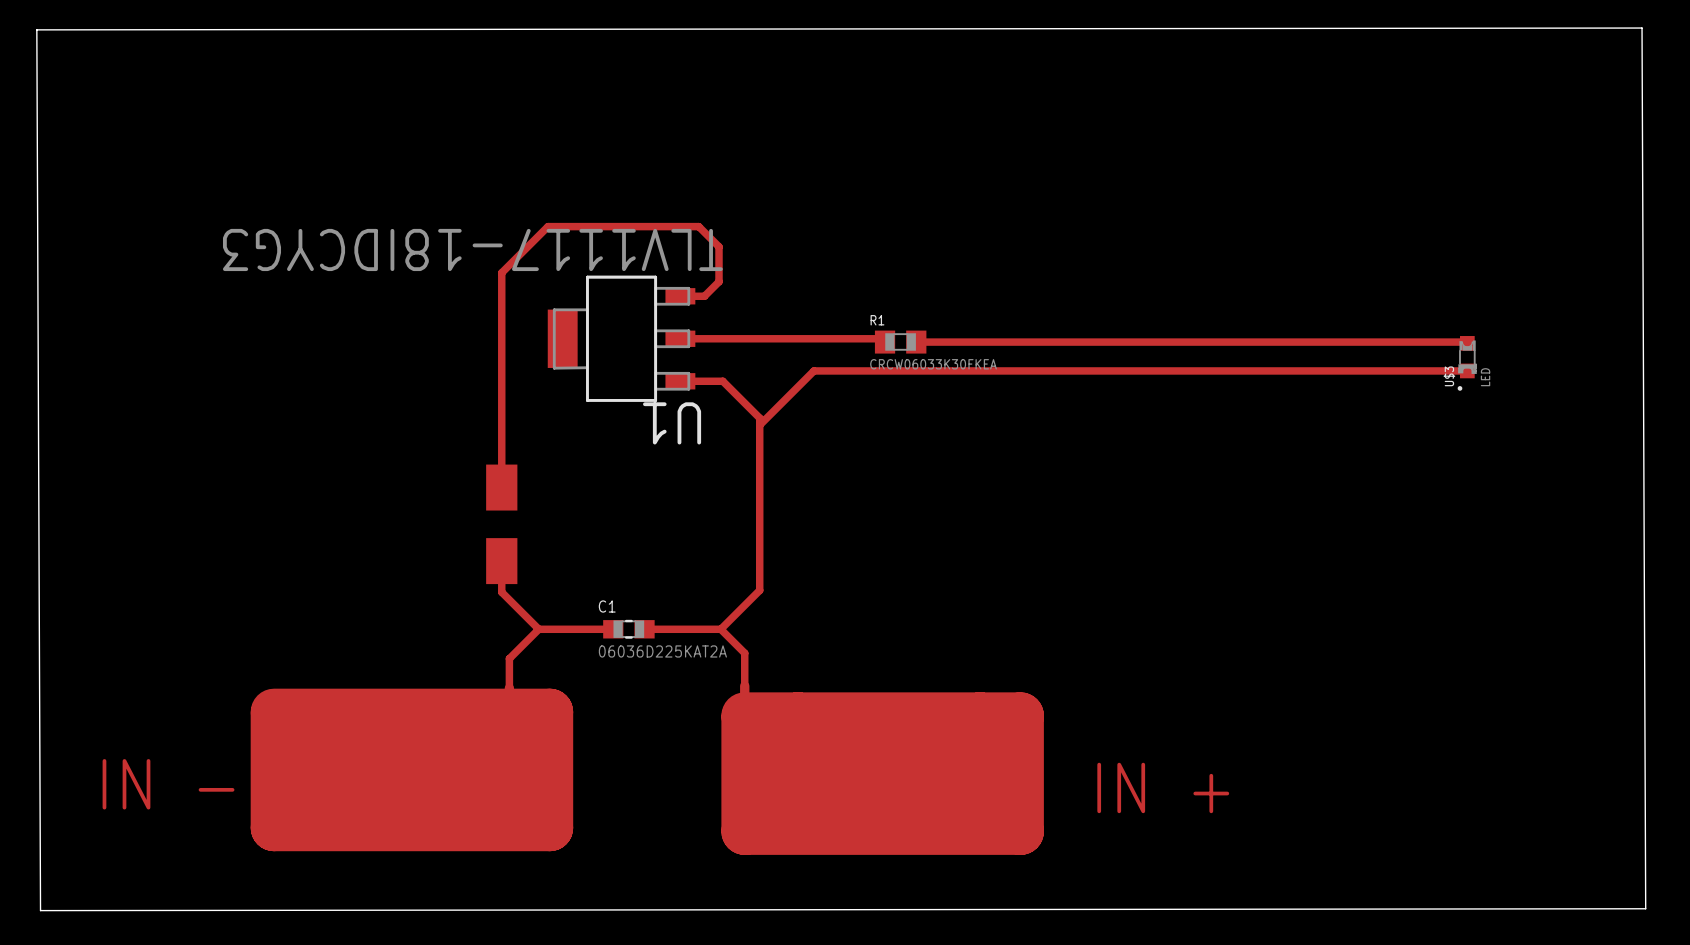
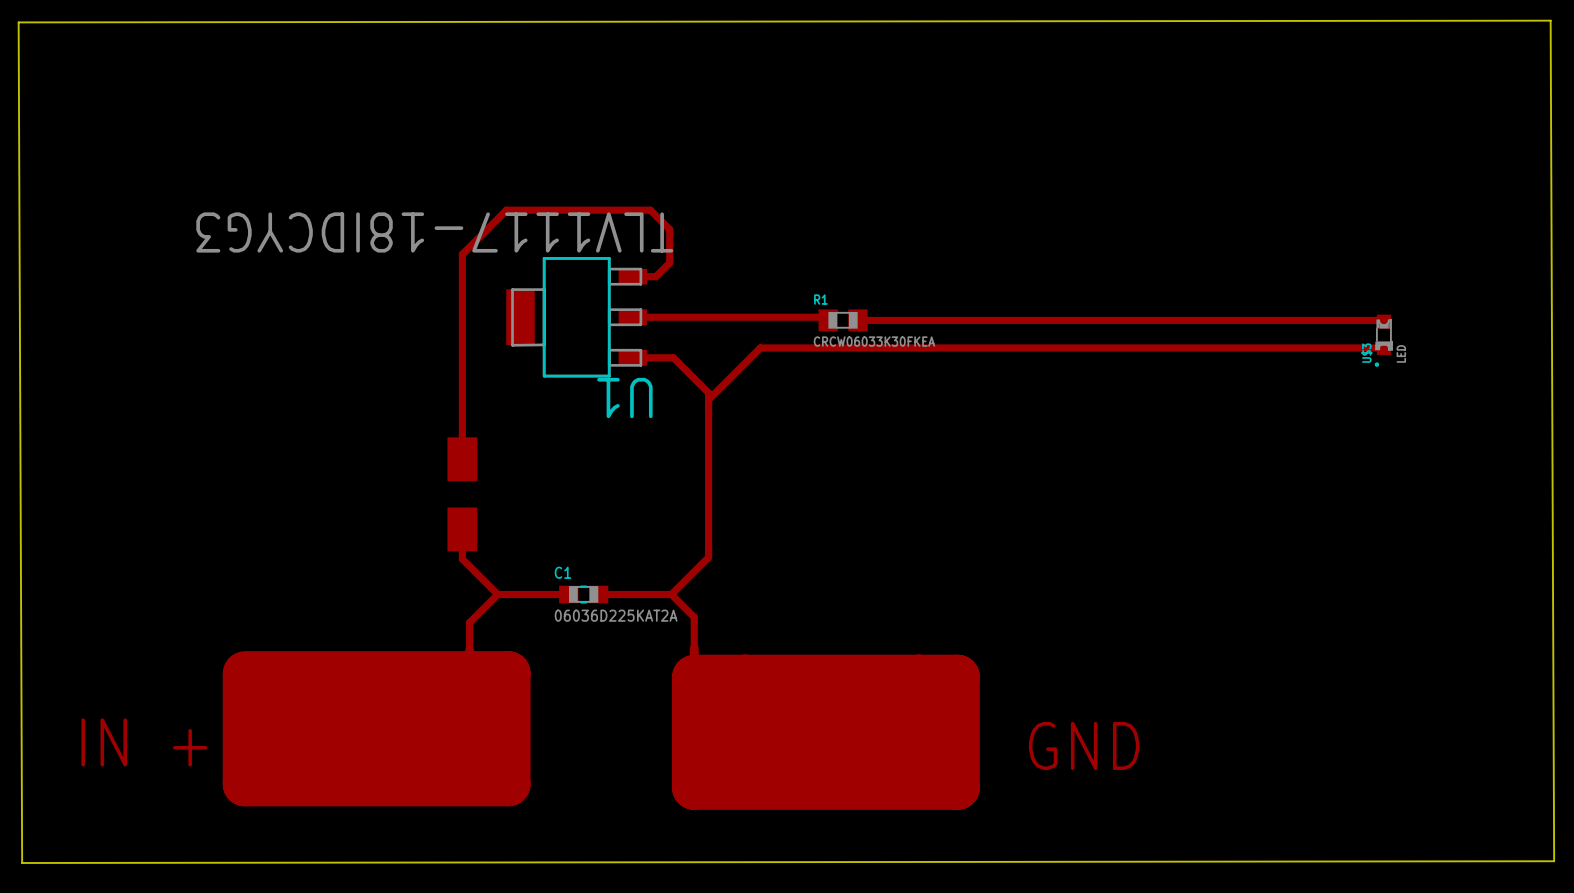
text: IN - (168, 784) -> IN + (144, 742)
text: IN + (1163, 787) -> GND (1084, 745)

